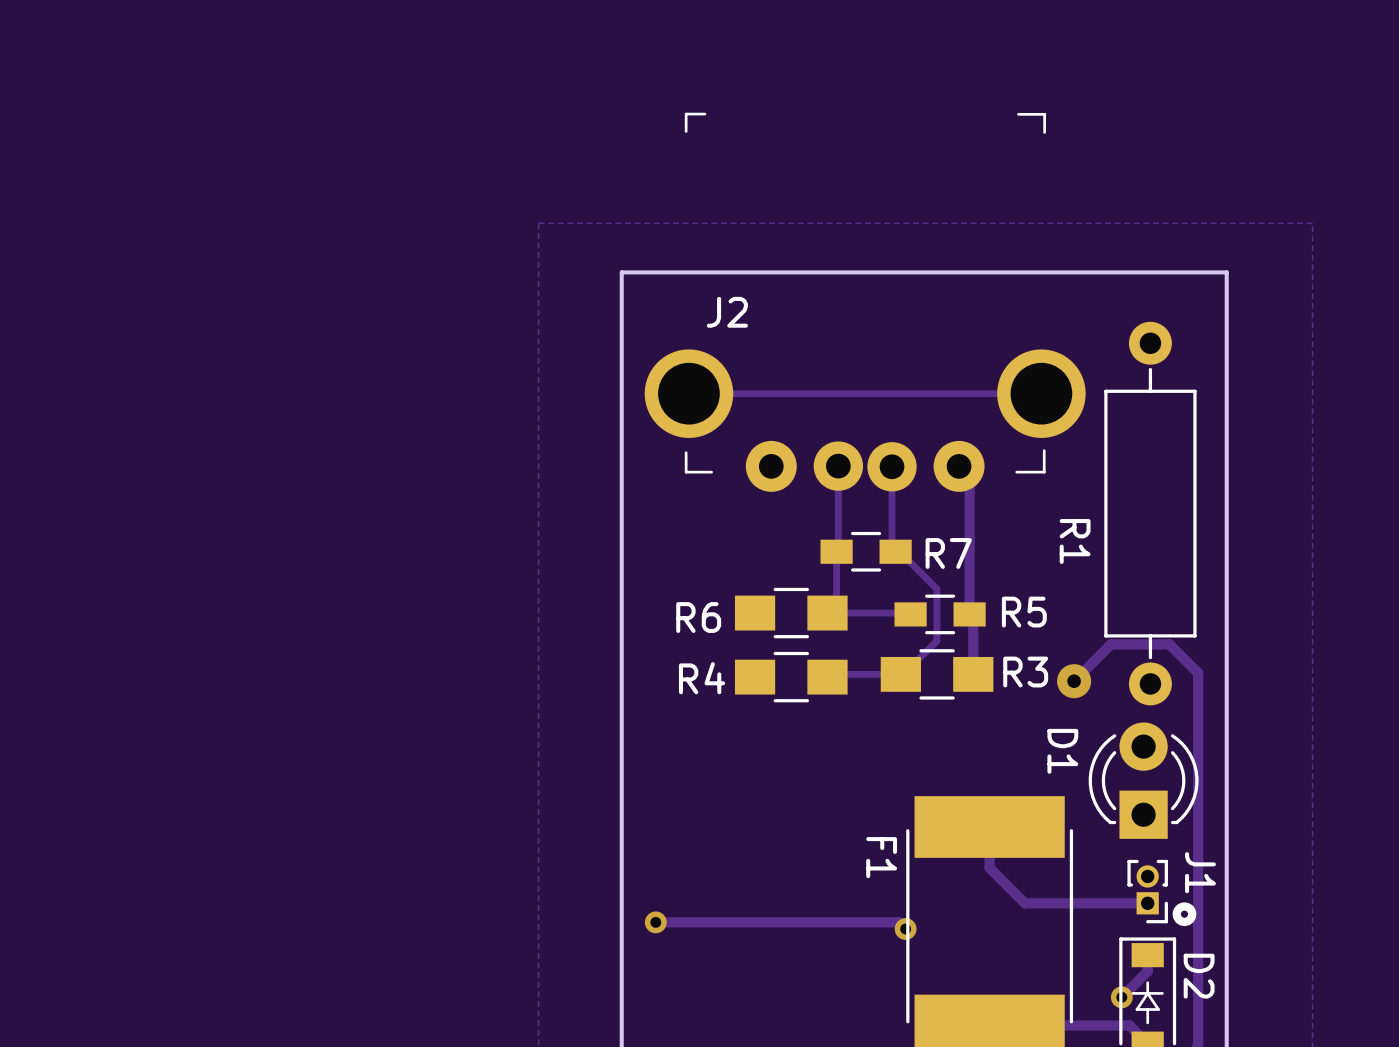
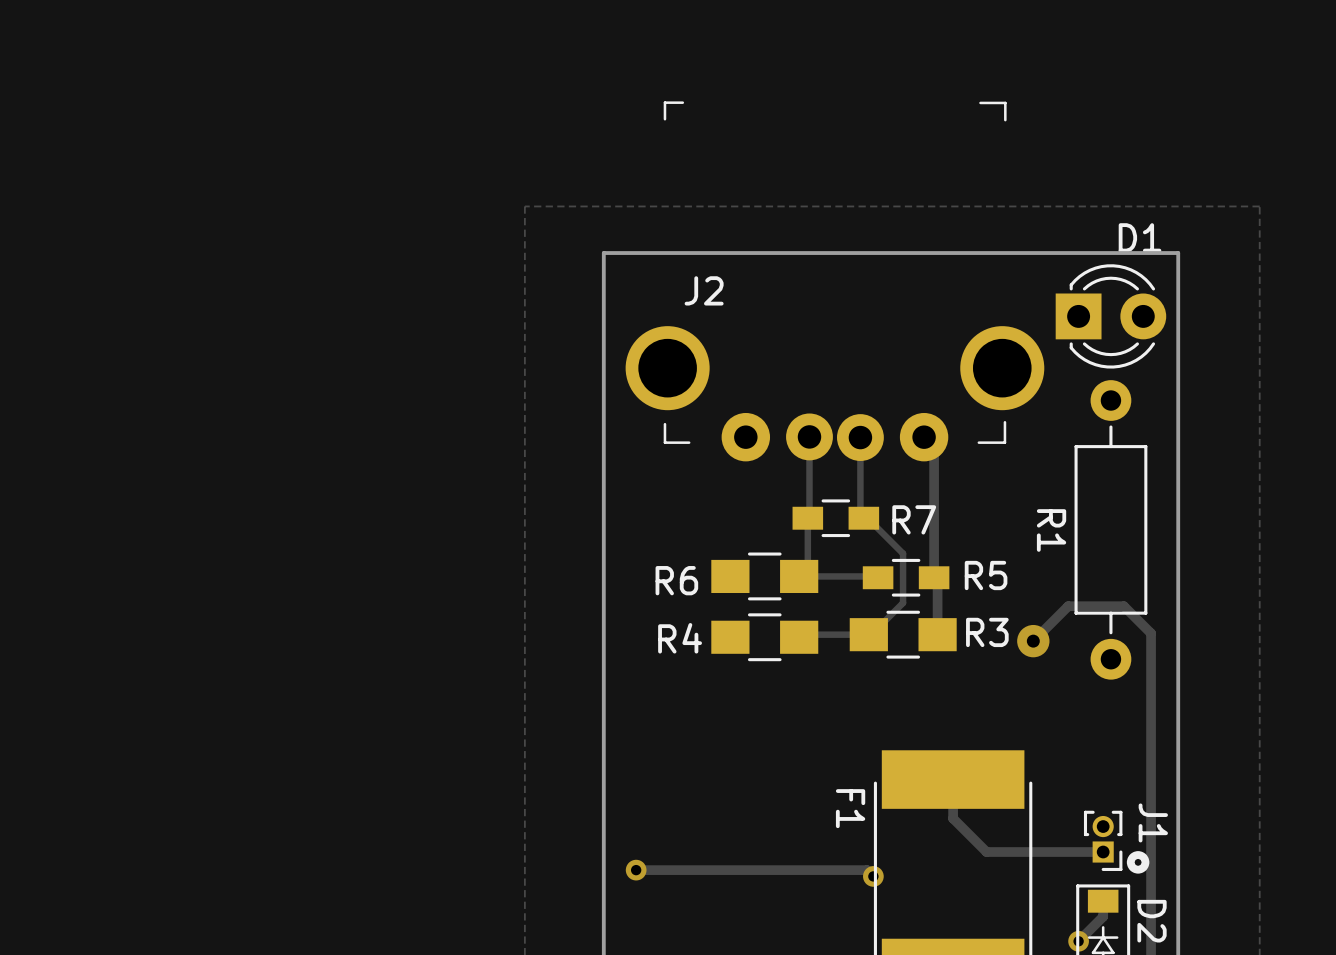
R1 footprint: [1104, 321, 1197, 706] -> [1074, 380, 1148, 680]
track: (1041, 393) (688, 393) -> none
D1 rotation: 0° (1143, 780) -> 90° clockwise (1110, 316)
D1 position: (1143, 780) -> (1110, 316)

